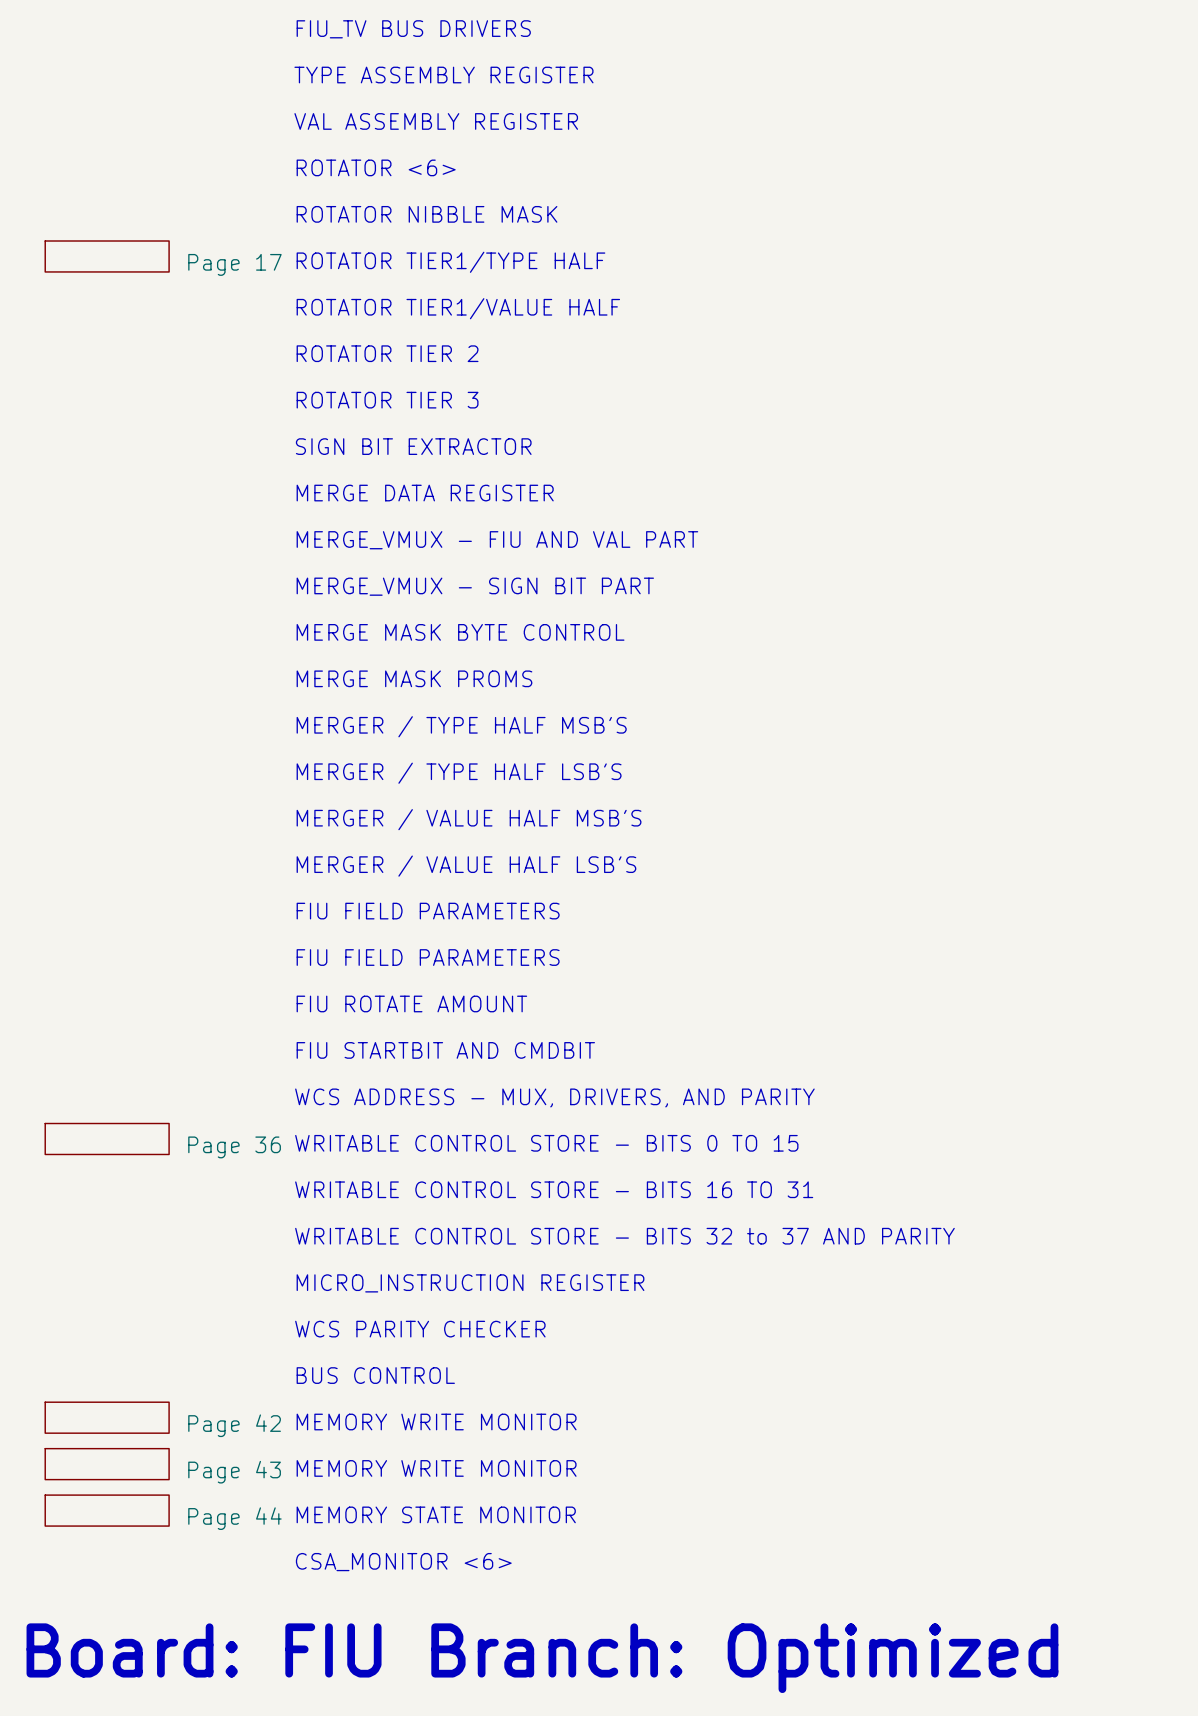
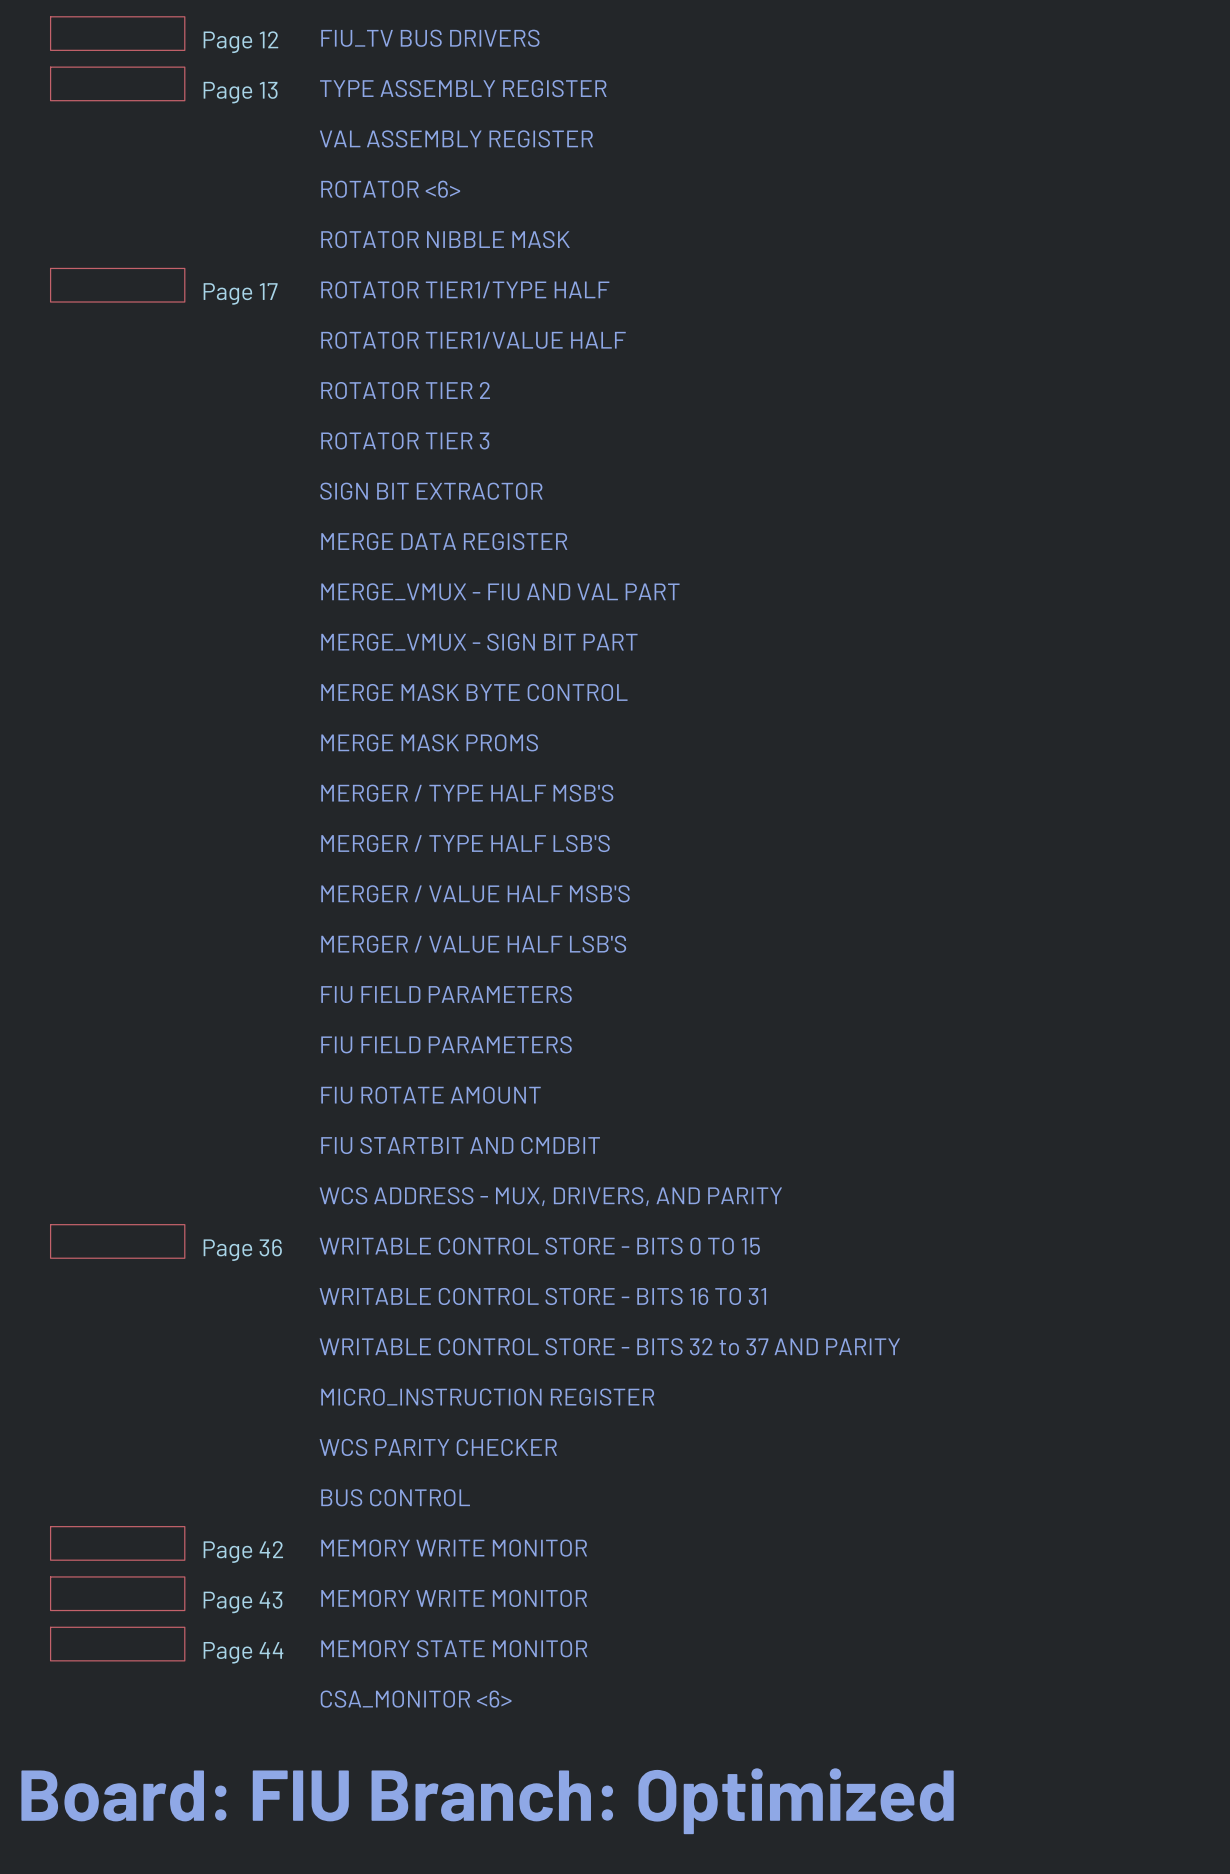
sheet Page 12: none -> (117, 33)
sheet Page 13: none -> (117, 83)

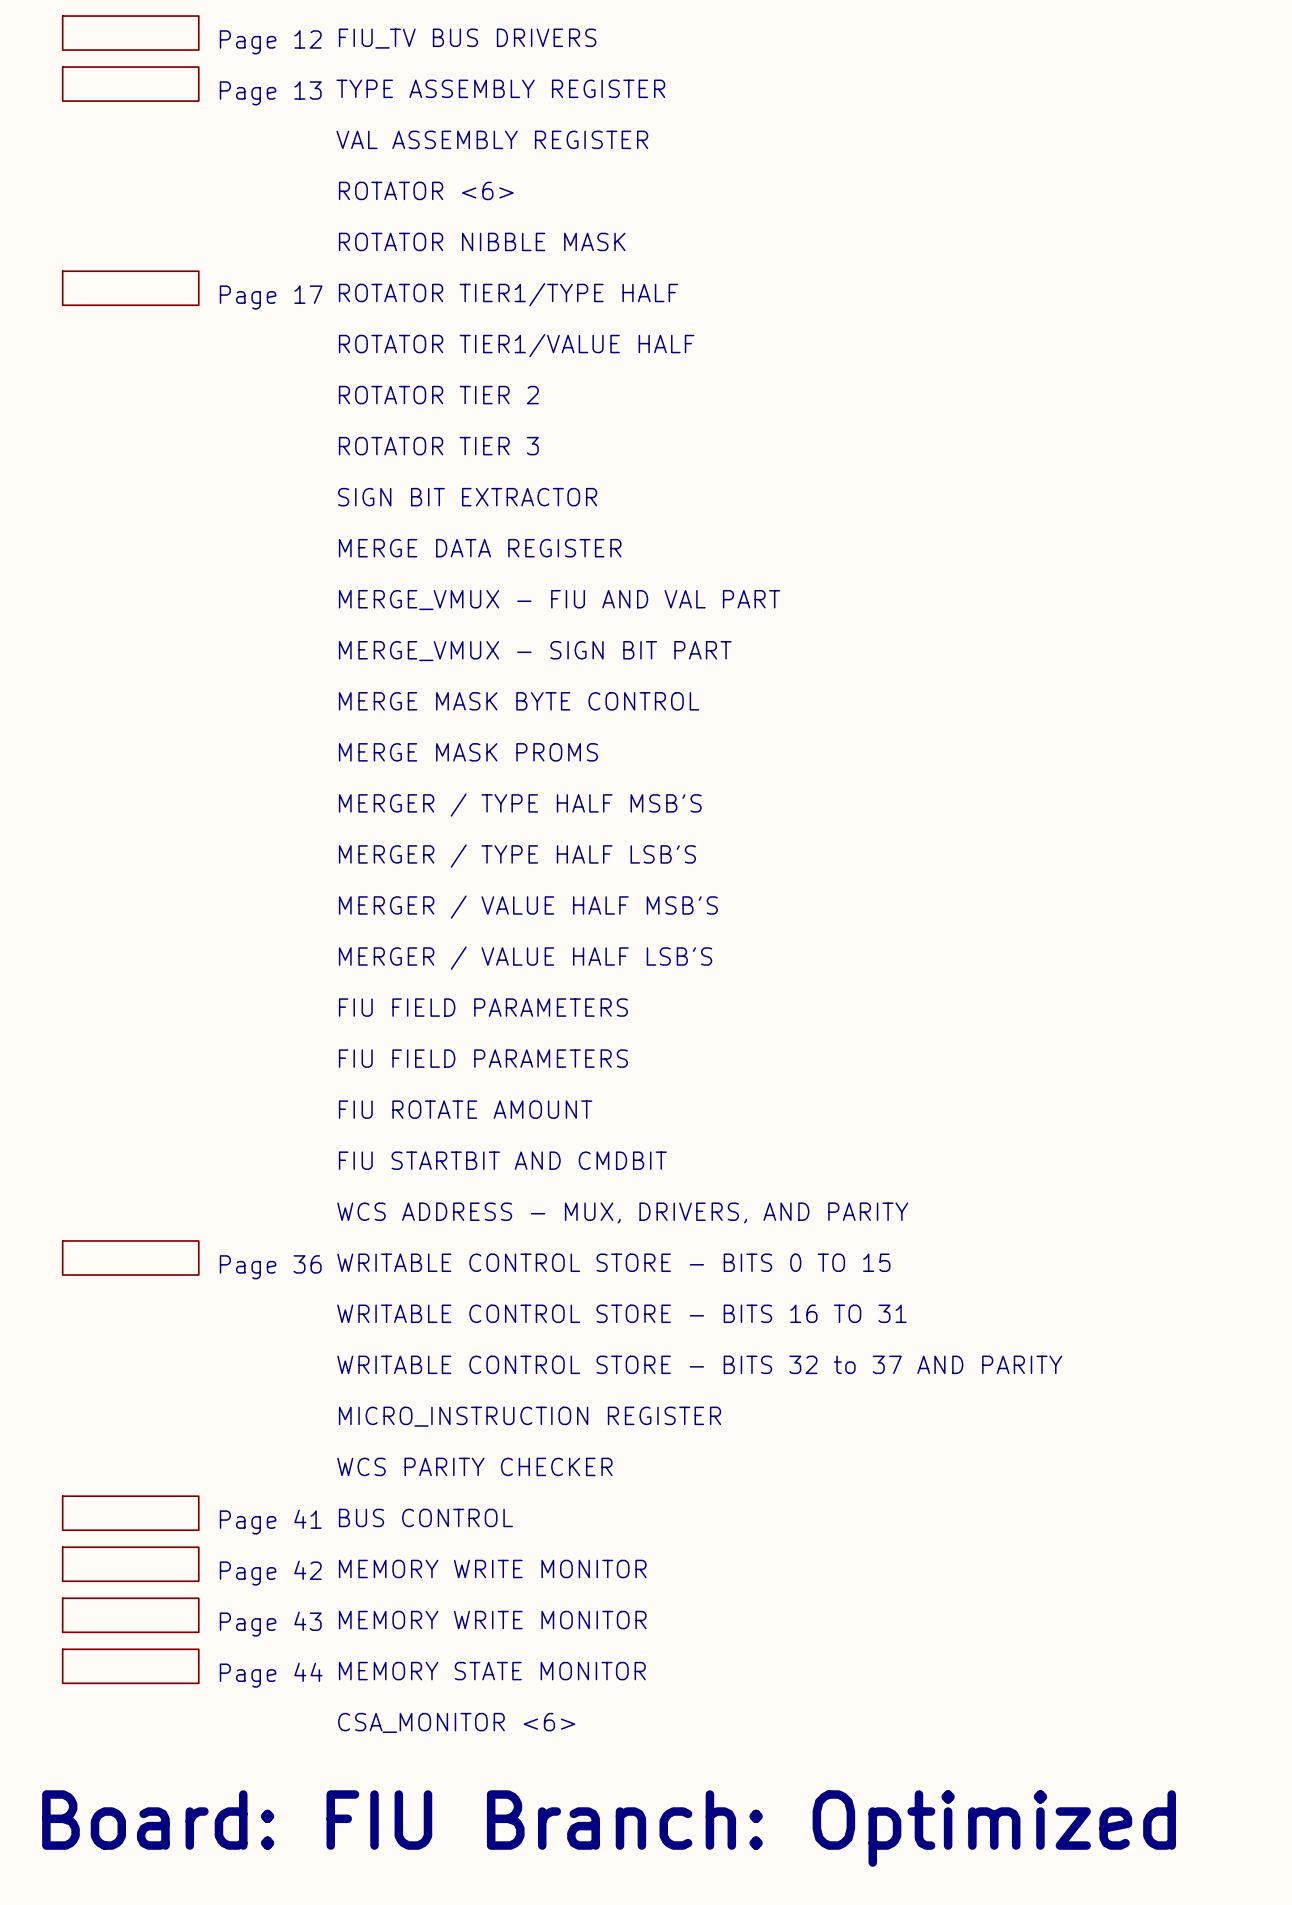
sheet Page 41: none -> (130, 1513)

